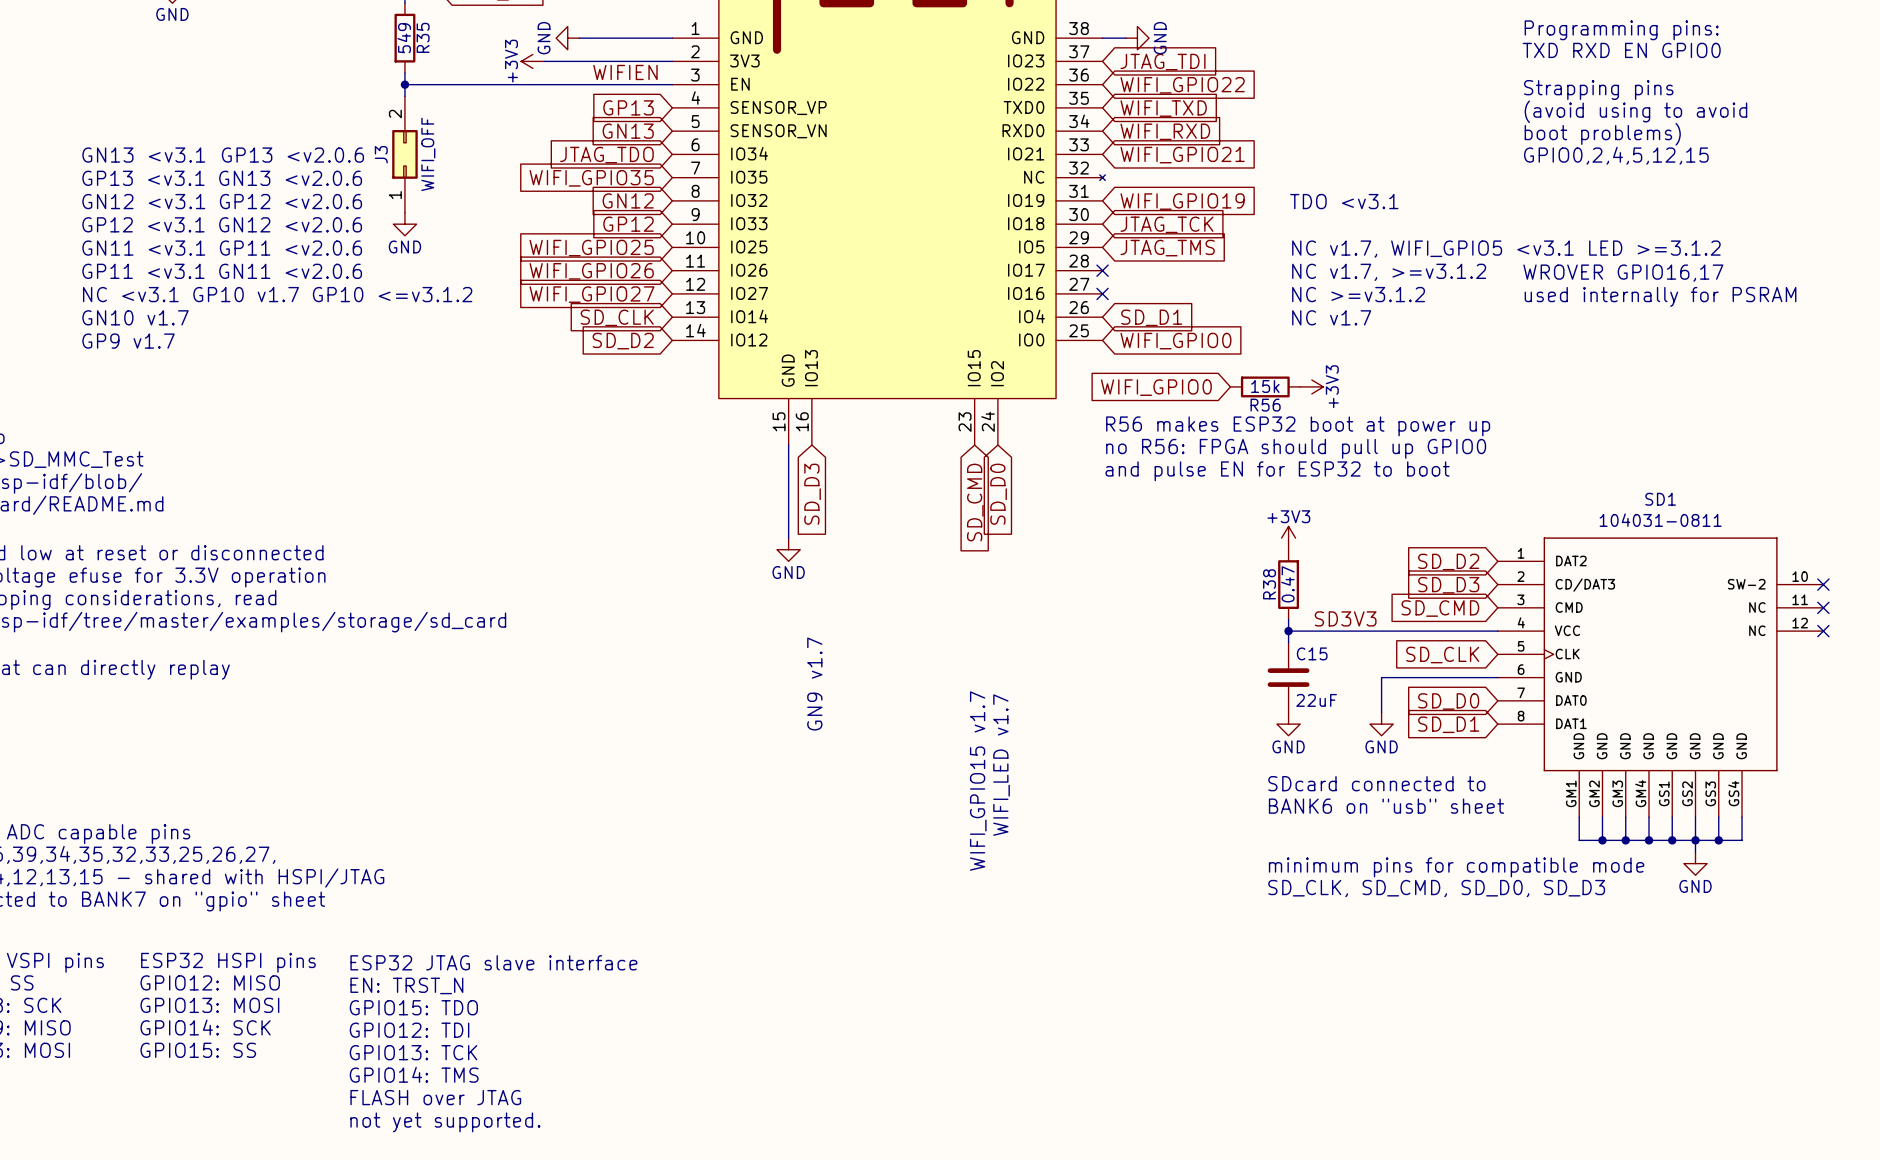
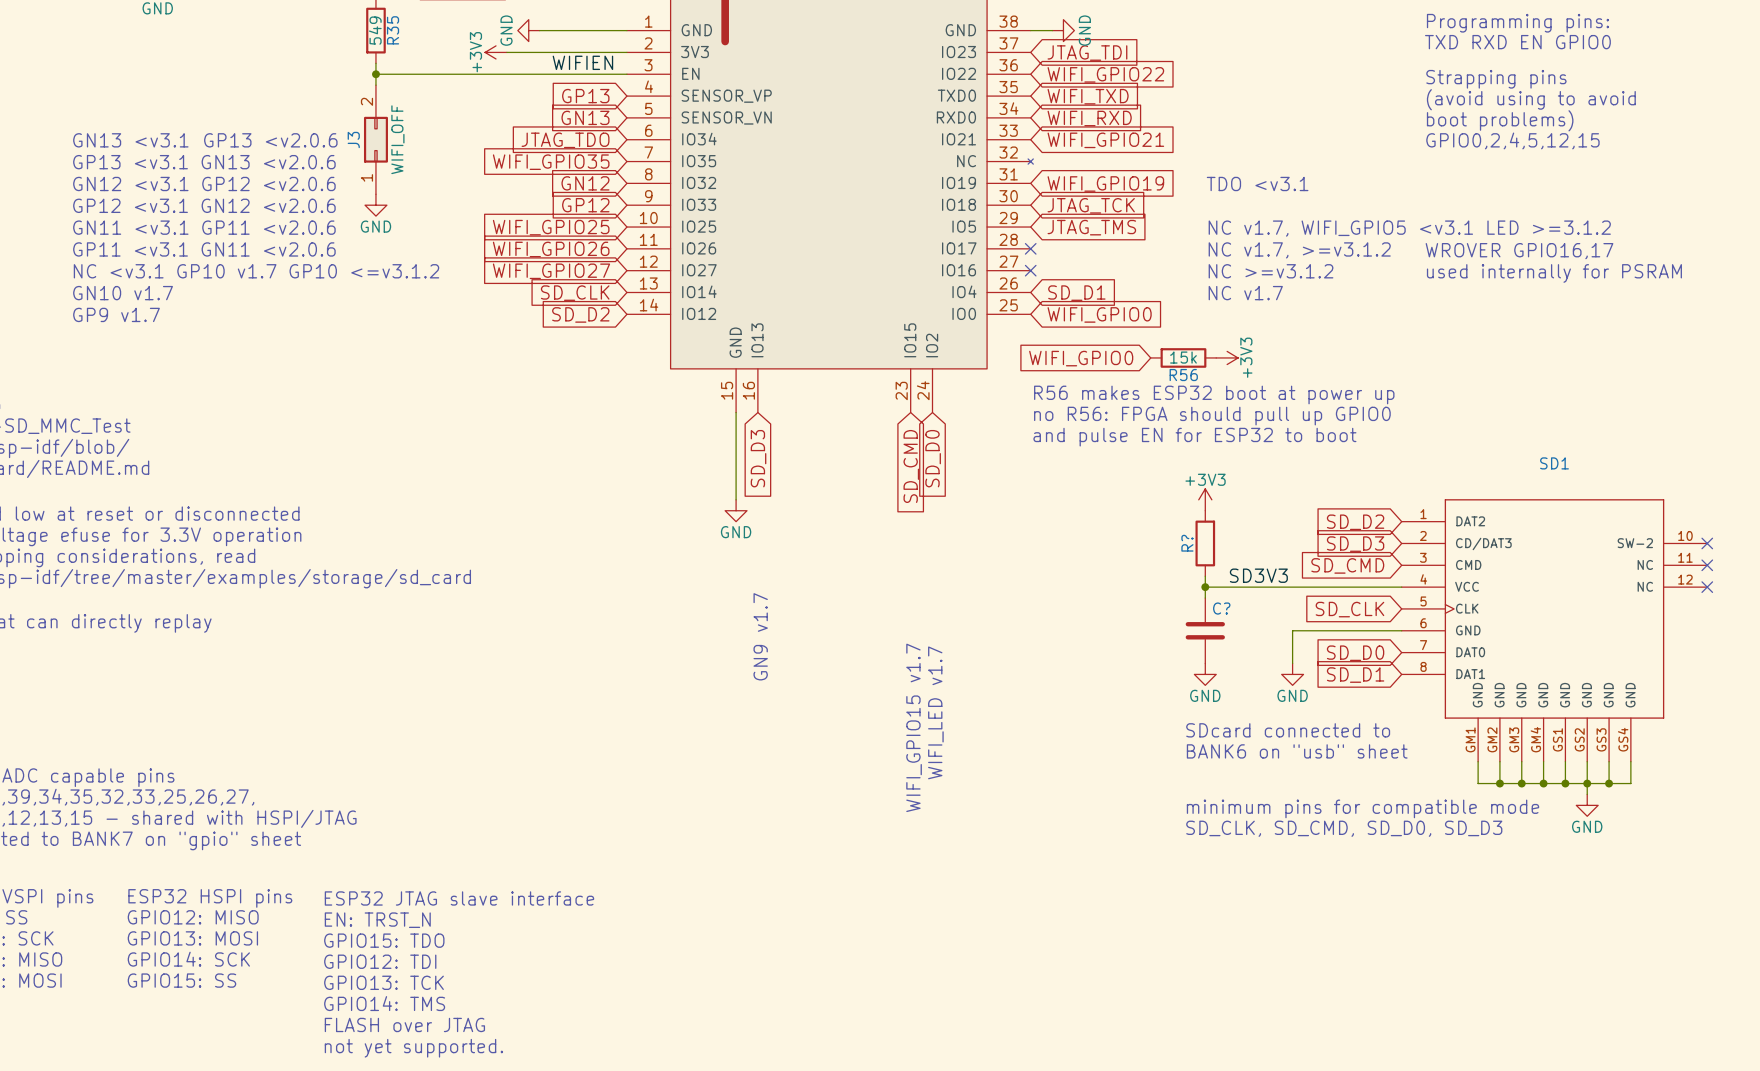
SD1 value: 104031-0811 (1660, 520) -> none
R38 name: R38 (1269, 584) -> R? (1187, 543)
R38 value: 0.47 (1287, 584) -> none
C15 name: C15 (1312, 653) -> C? (1221, 608)
C15 value: 22uF (1316, 700) -> none

